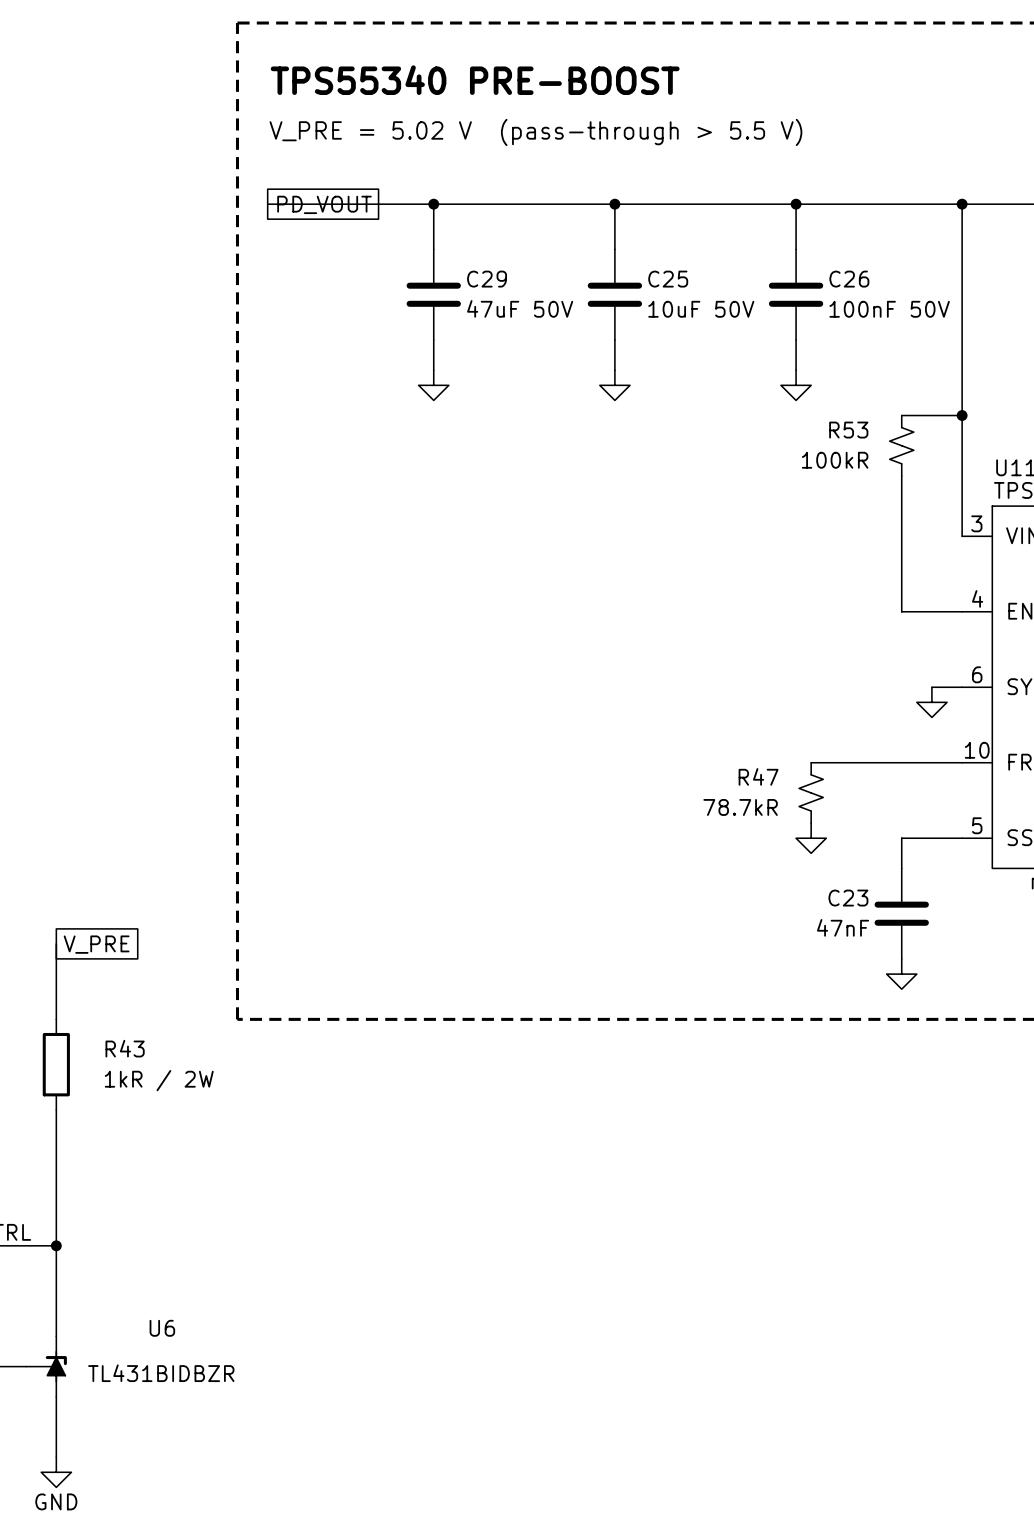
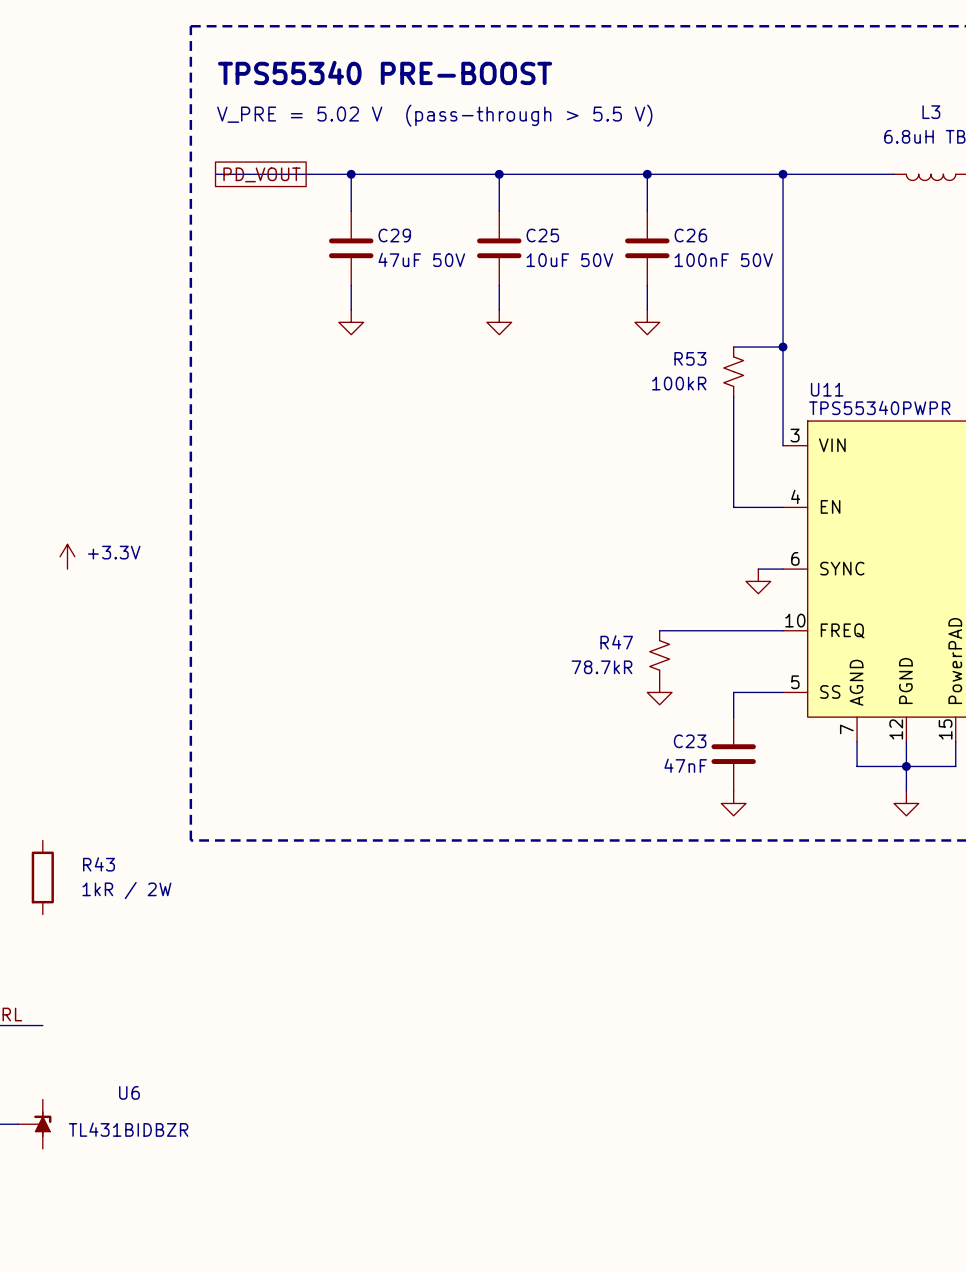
power symbol: none -> +3.3V (67, 556)
wire: (56, 943) (56, 1019) -> none
global label: V_PRE (96, 944) -> none
wire: (56, 1109) (56, 1336) -> none
junction: (56, 1245) -> none
wire: (56, 1396) (56, 1457) -> none
power symbol: GND (56, 1472) -> none

